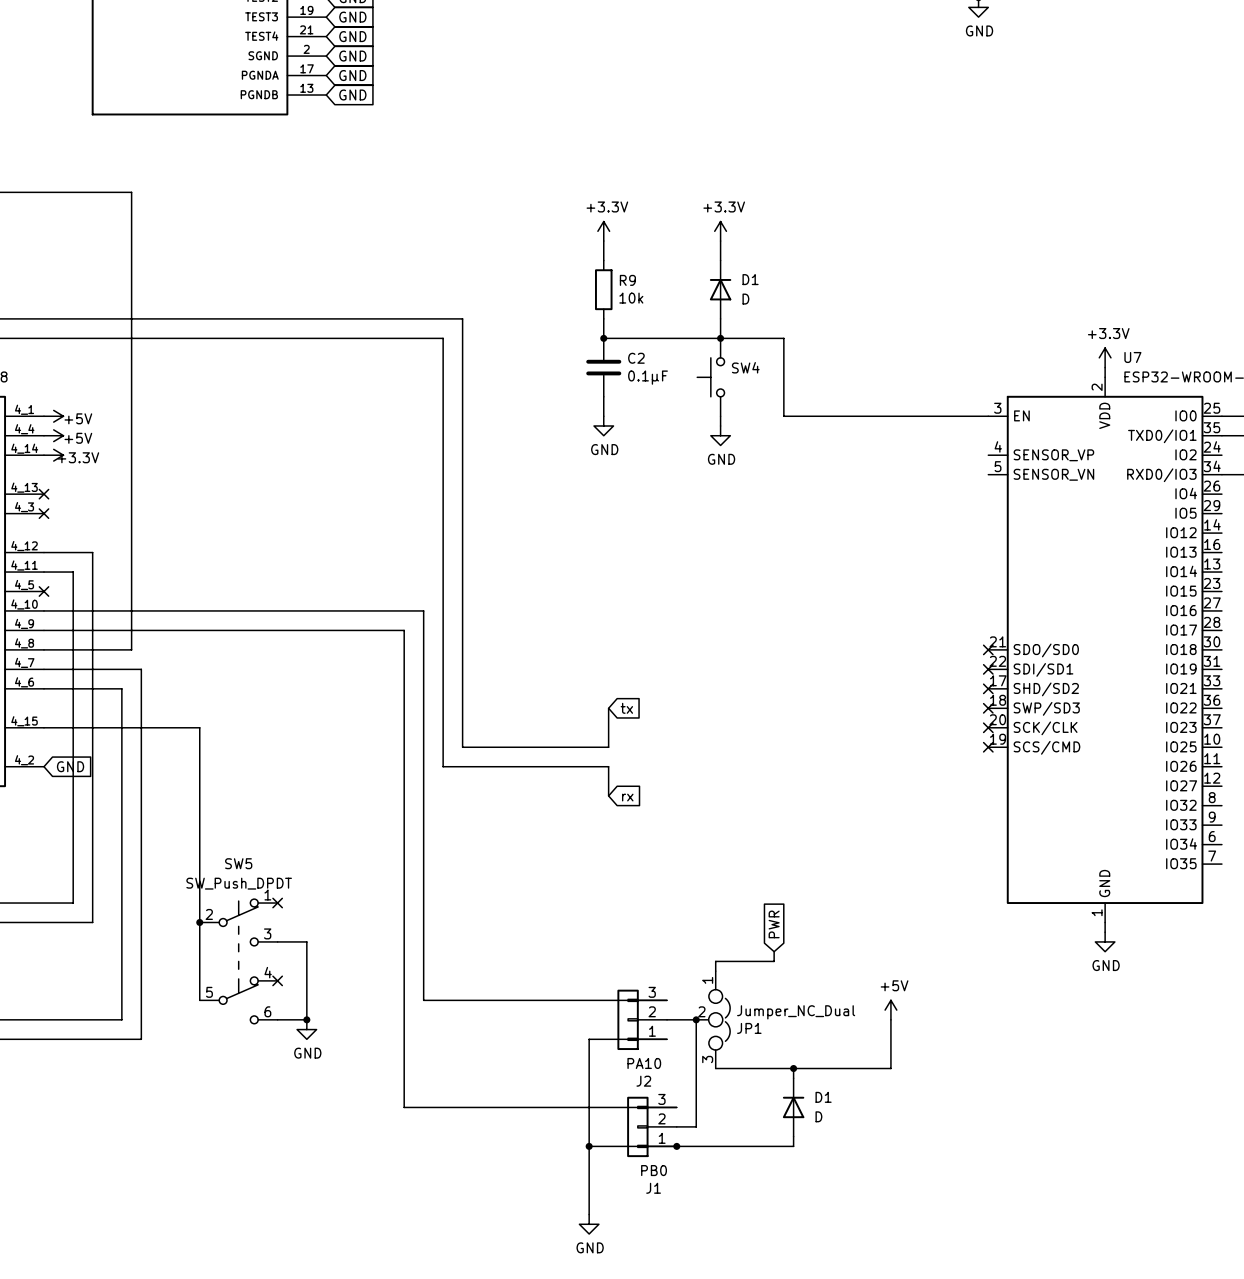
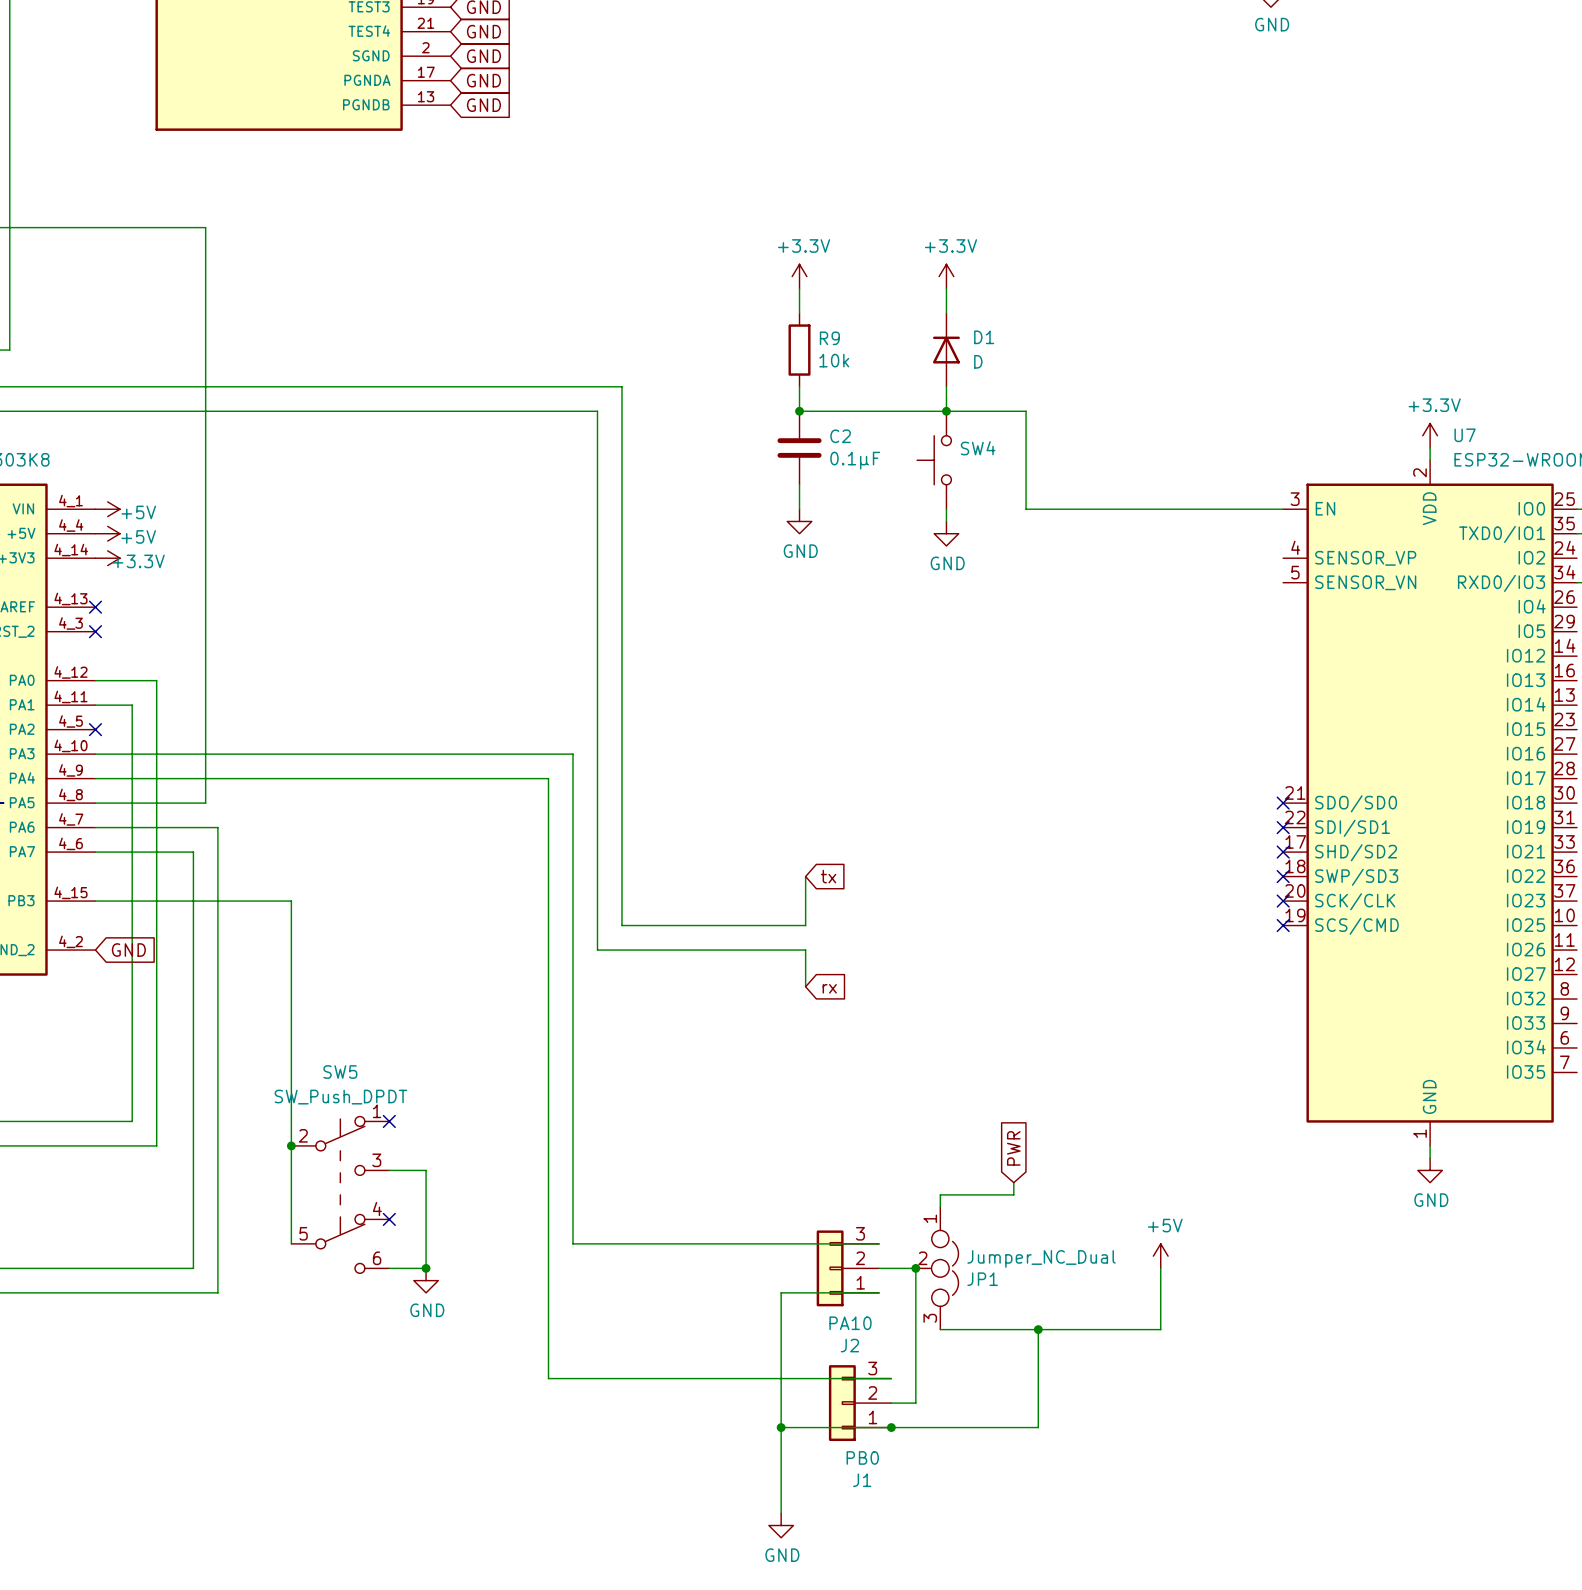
D1: D (793, 1107) -> none

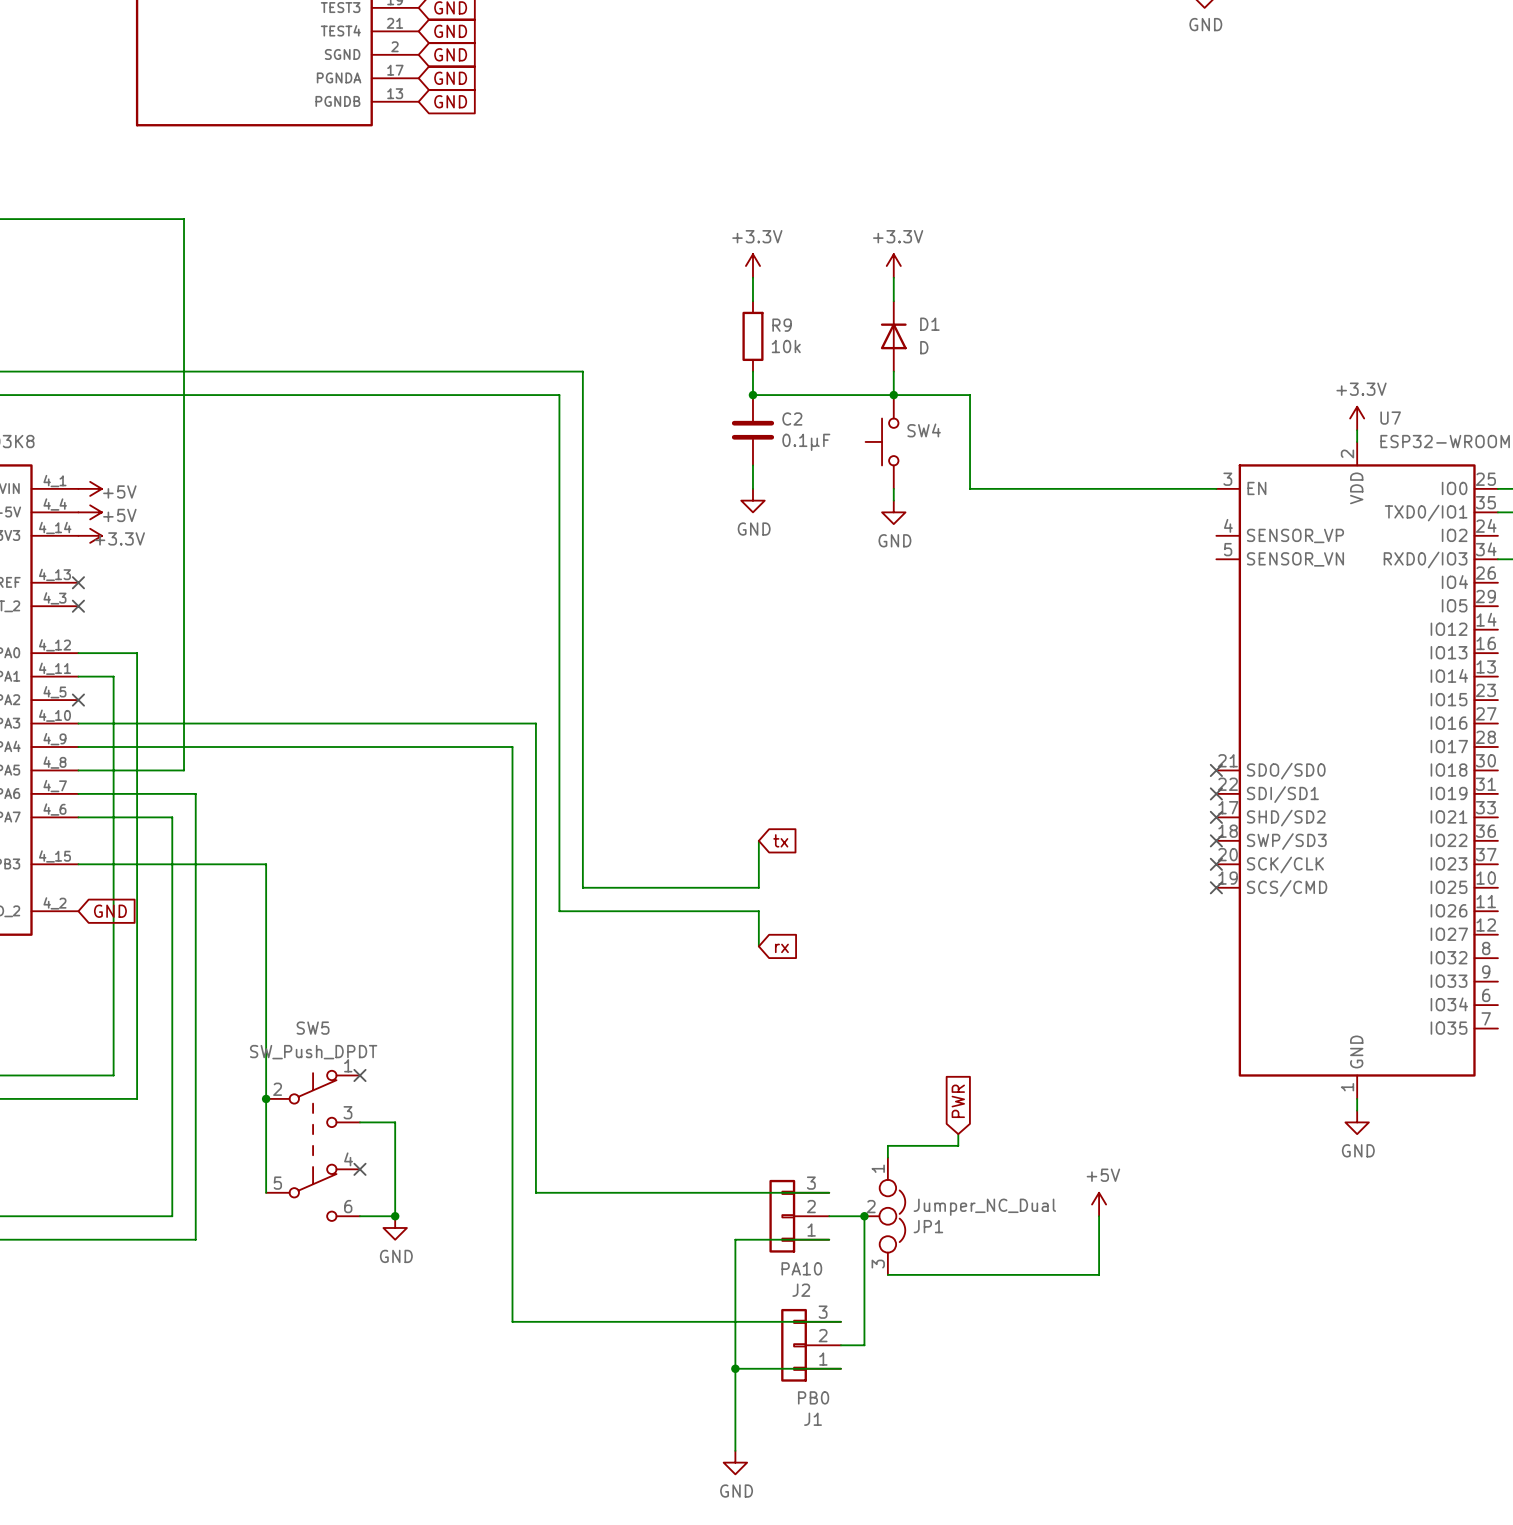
wire: (1038, 1329) (1038, 1427) (891, 1427) -> none
junction: (1038, 1329) -> none
junction: (891, 1427) -> none

